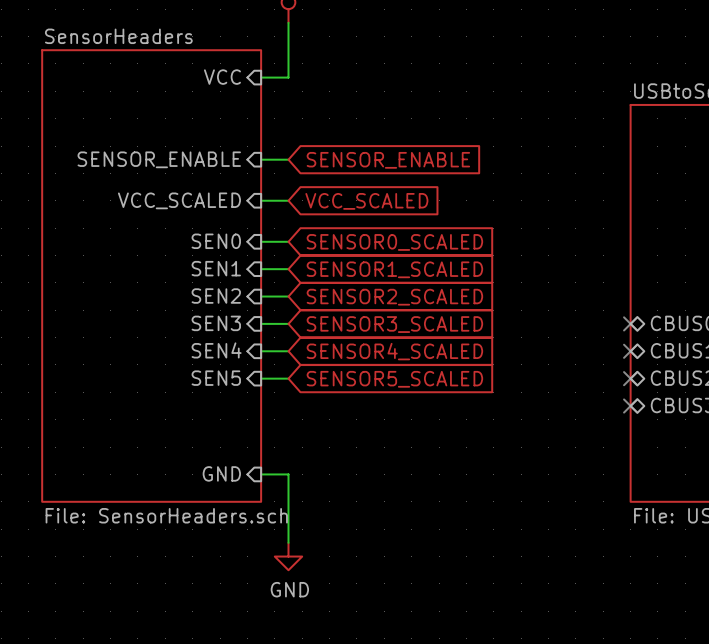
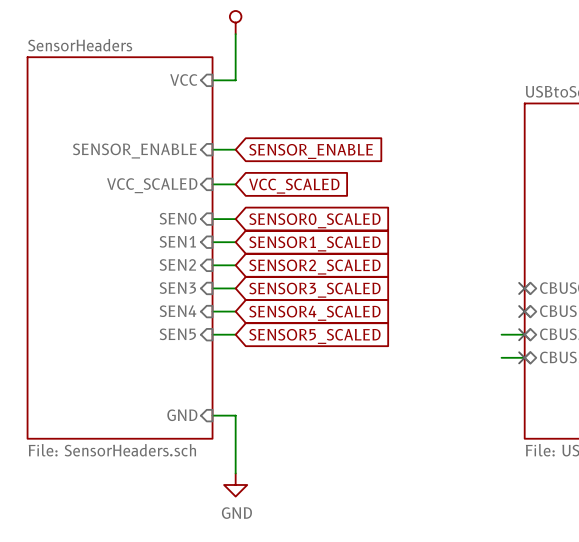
wire: none -> (501, 334) (524, 334)
wire: none -> (501, 357) (524, 357)

